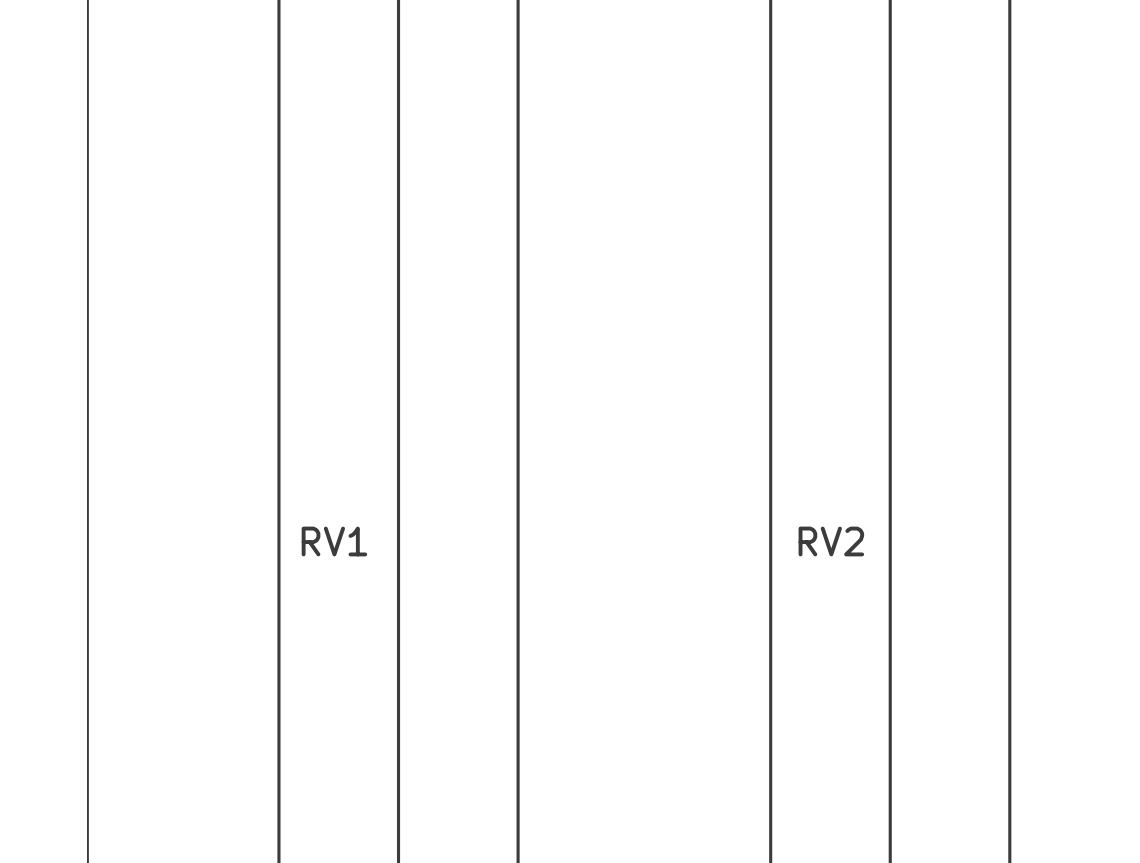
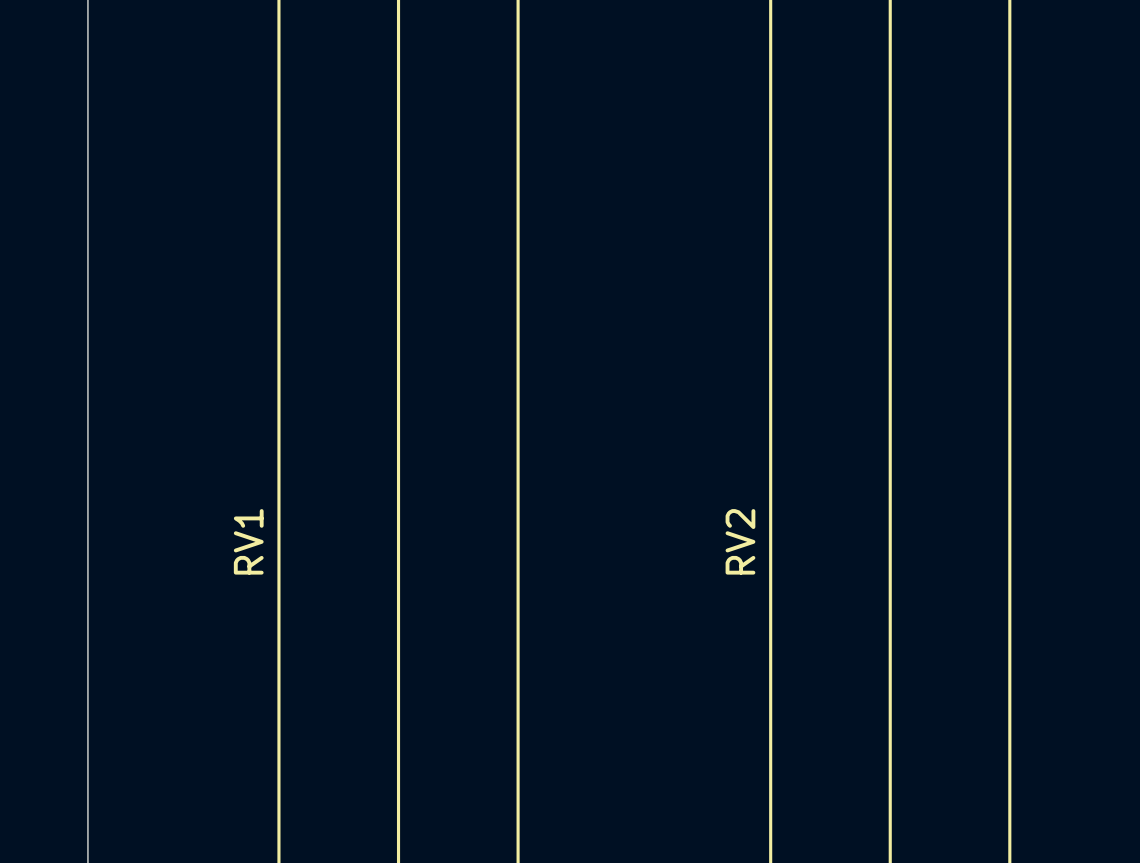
RV1 name rotation: 0° (334, 541) -> 90° counterclockwise (248, 541)
RV2 name rotation: 0° (831, 541) -> 90° counterclockwise (740, 541)

